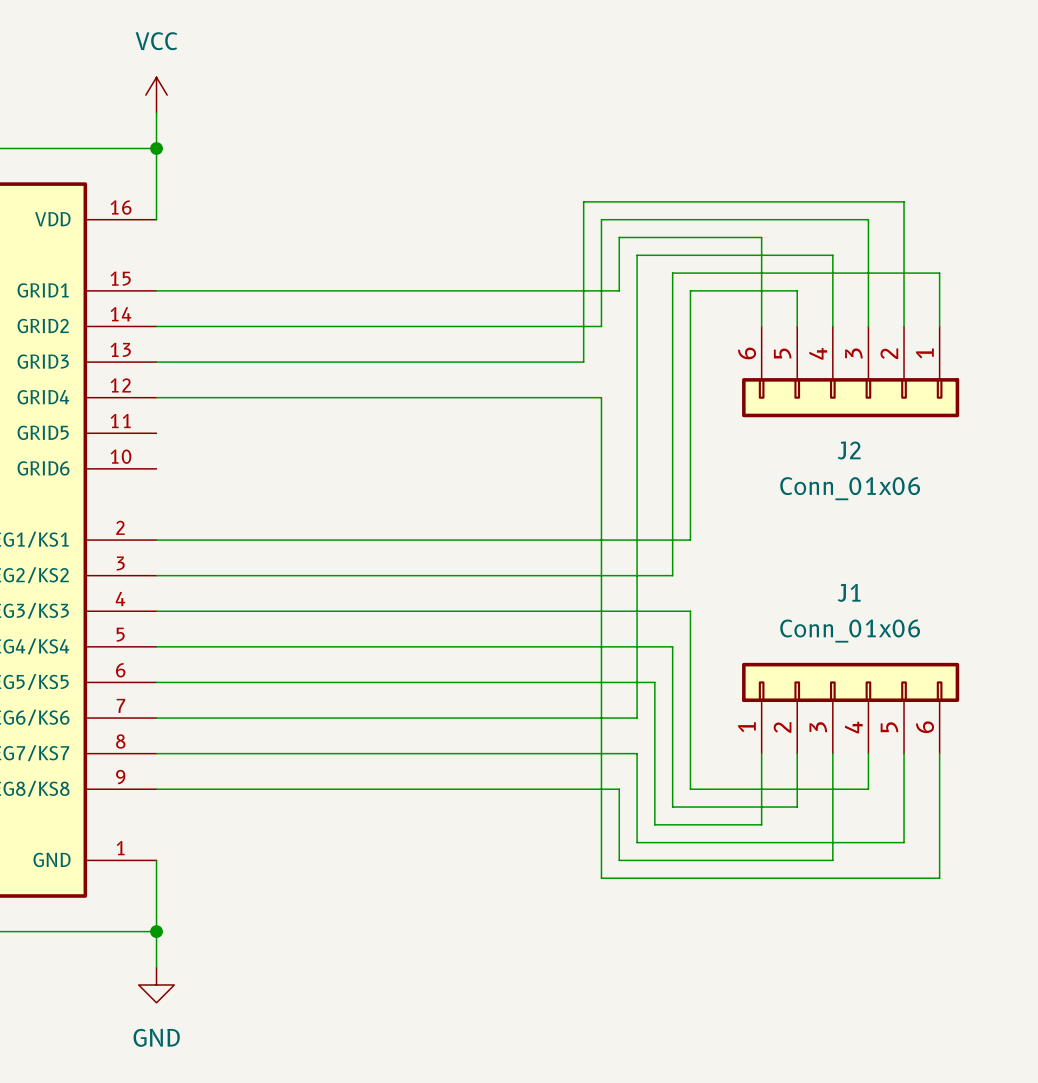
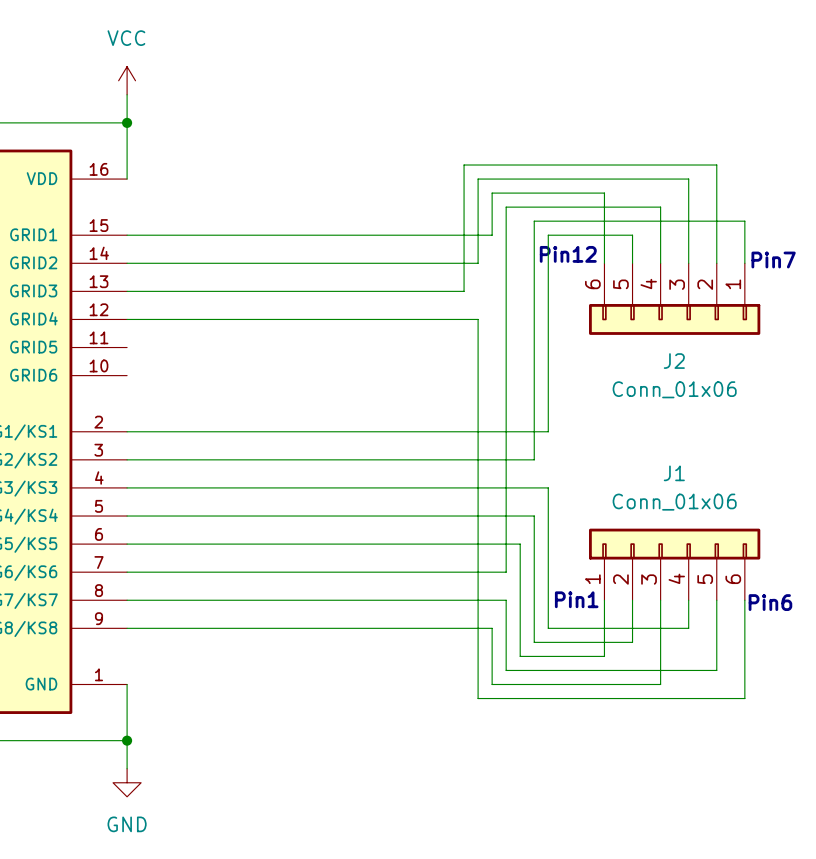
text: none -> Pin12 (568, 254)
text: none -> Pin7 (773, 260)
text: none -> Pin1 (576, 599)
text: none -> Pin6 (770, 602)

